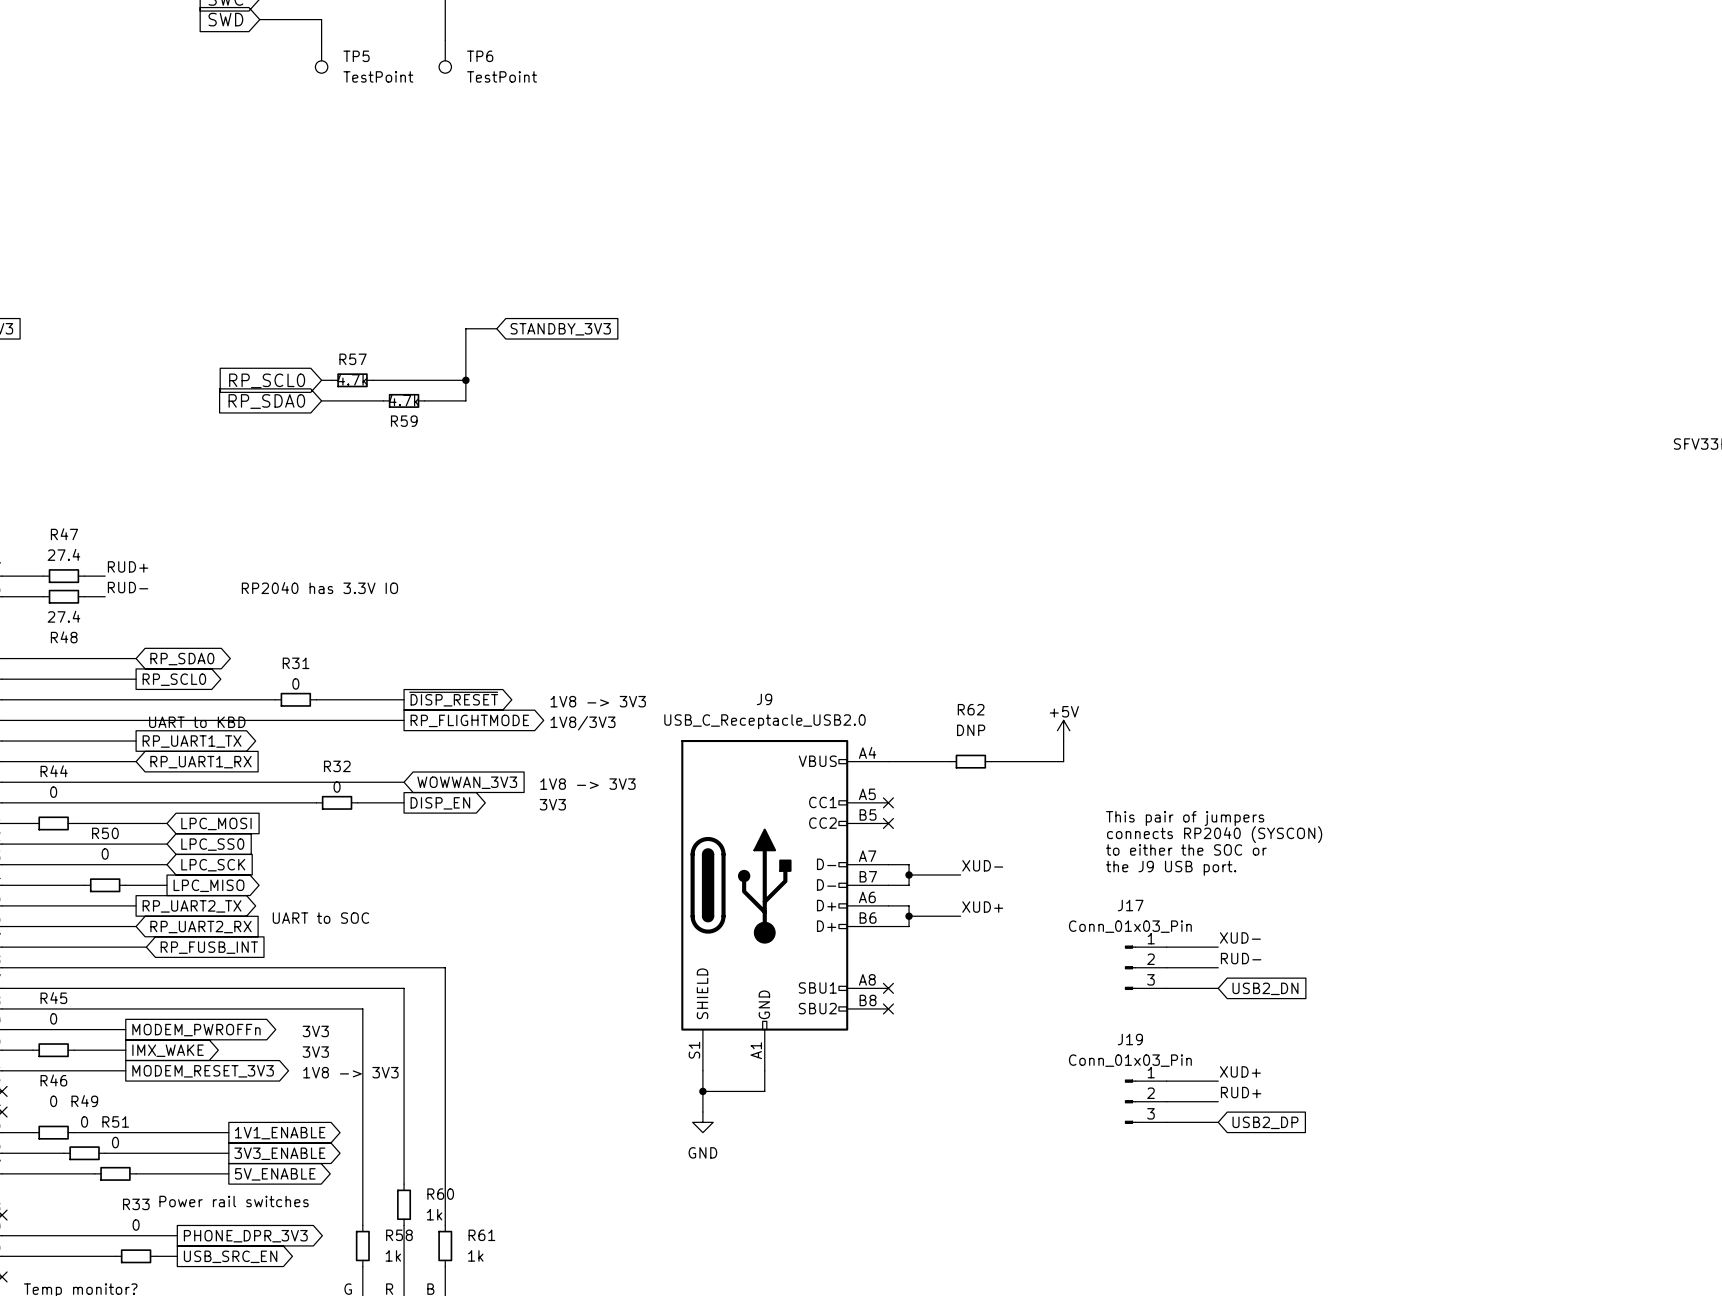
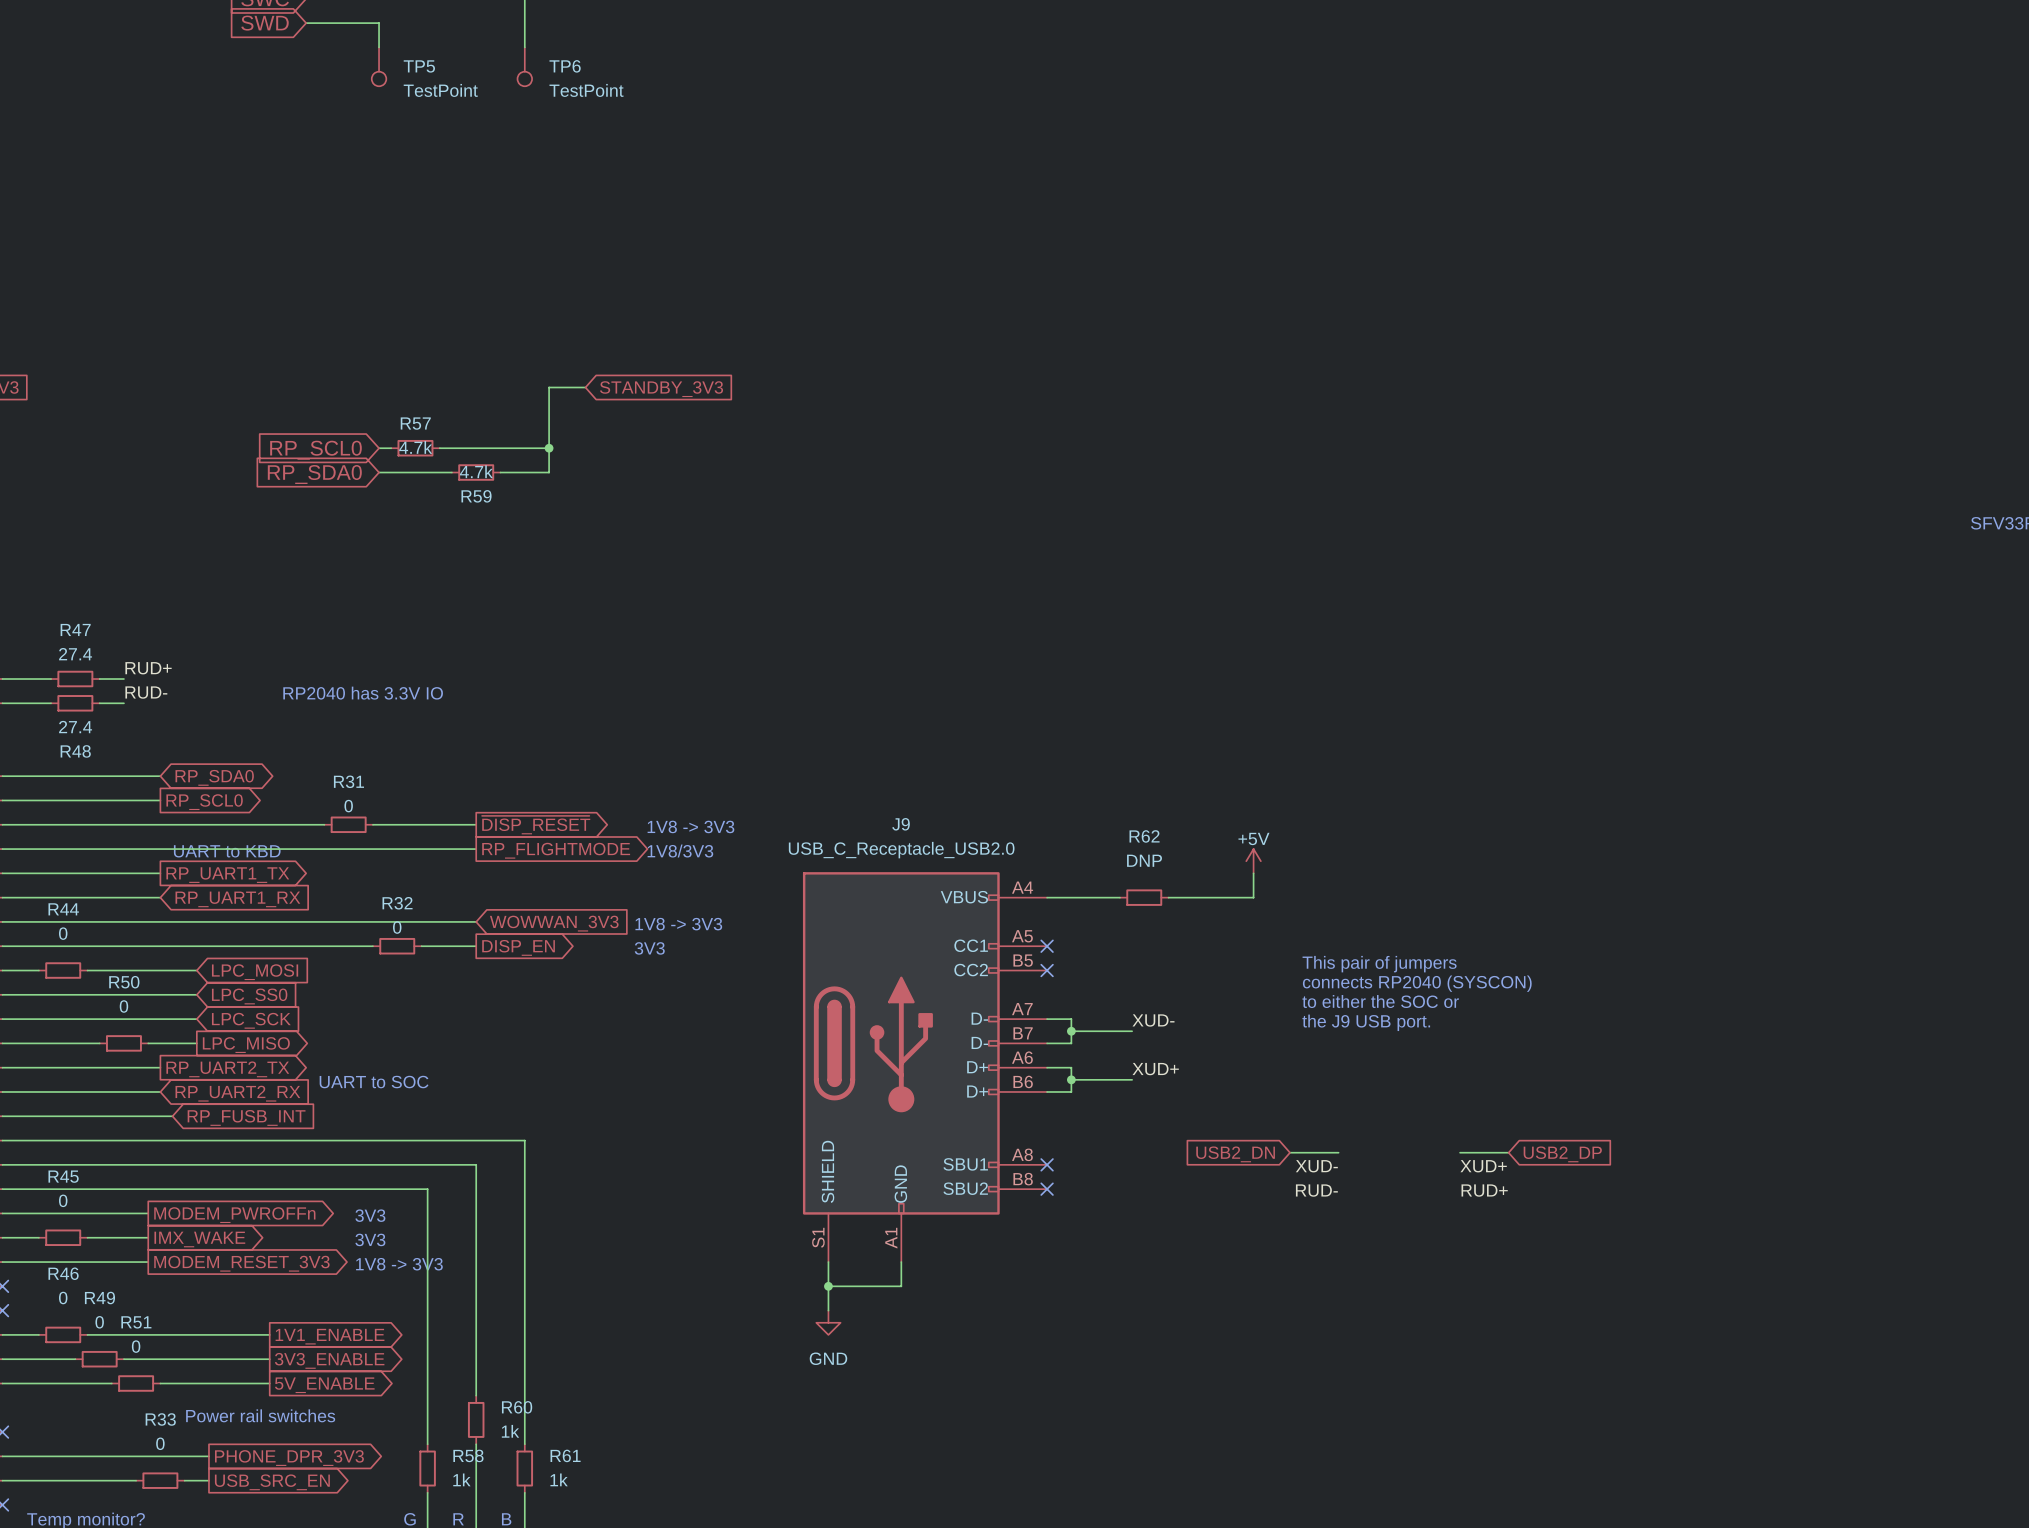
label position: XUD- (1240, 937) -> XUD- (1316, 1166)
wire: (1166, 947) (1218, 947) -> none
label position: RUD- (1241, 958) -> RUD- (1316, 1190)
J17: Conn_01x03_Pin (1145, 967) -> none
wire: (1166, 967) (1218, 967) -> none
wire: none -> (1290, 1152) (1338, 1152)
wire: (1166, 988) (1218, 988) -> none
global label rotation: 0° (1265, 988) -> 180° (1235, 1154)
global label position: USB2_DN (1265, 988) -> USB2_DN (1235, 1154)
label position: XUD+ (1240, 1071) -> XUD+ (1483, 1166)
wire: (1166, 1081) (1218, 1081) -> none
label position: RUD+ (1241, 1092) -> RUD+ (1484, 1190)
J19: Conn_01x03_Pin (1145, 1101) -> none
wire: (1166, 1101) (1218, 1101) -> none
wire: (1166, 1122) (1218, 1122) -> none
global label position: USB2_DP (1265, 1122) -> USB2_DP (1562, 1154)

